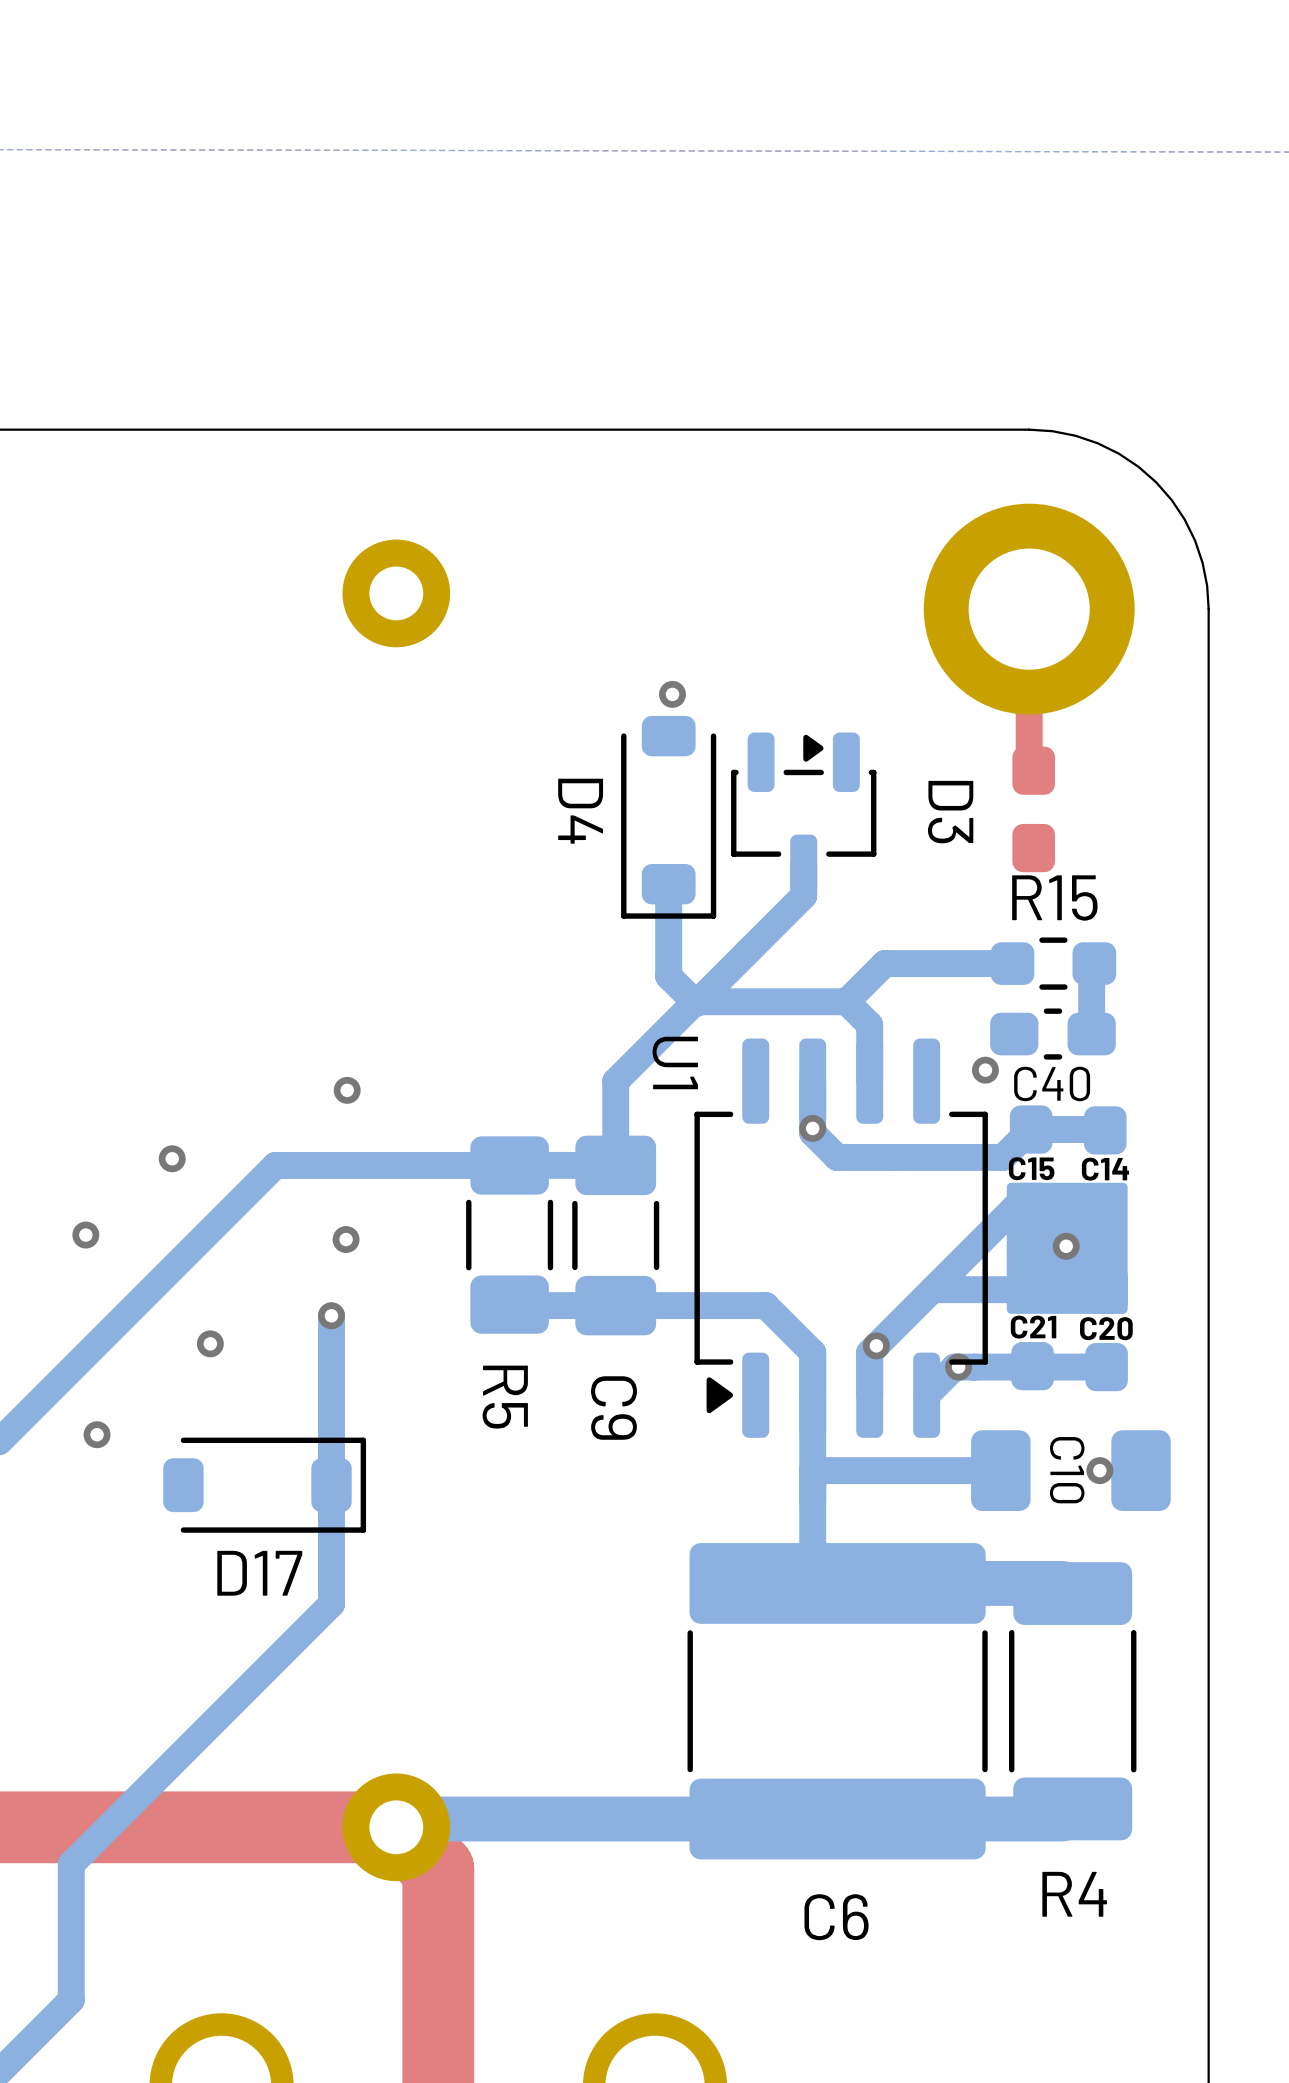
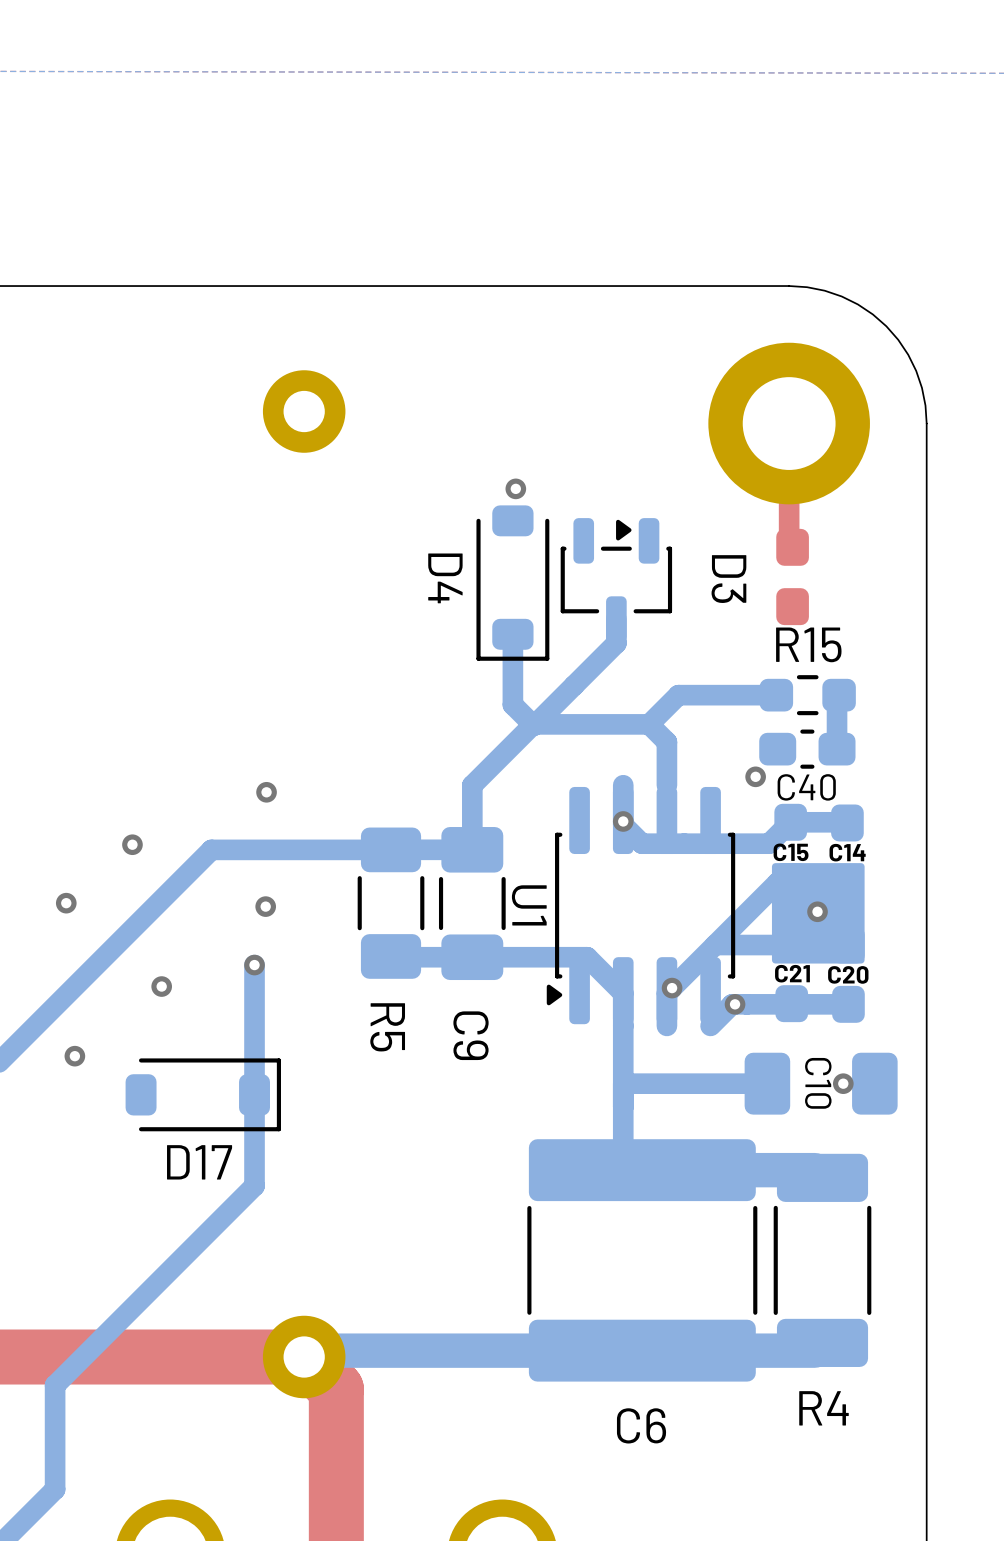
U1 footprint: [694, 1038, 988, 1438] -> [546, 786, 736, 1025]
U1 name position: U1 (675, 1062) -> U1 (529, 905)

